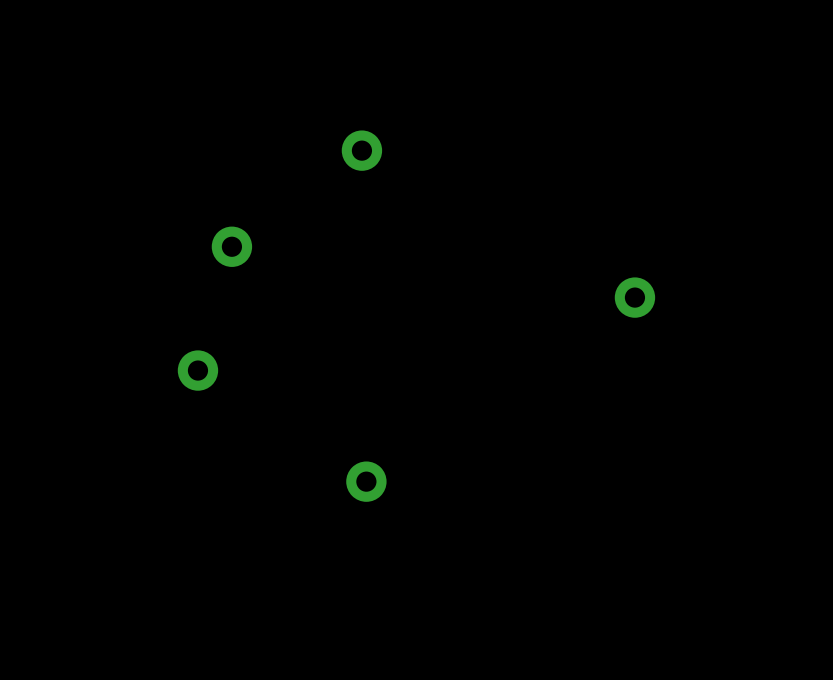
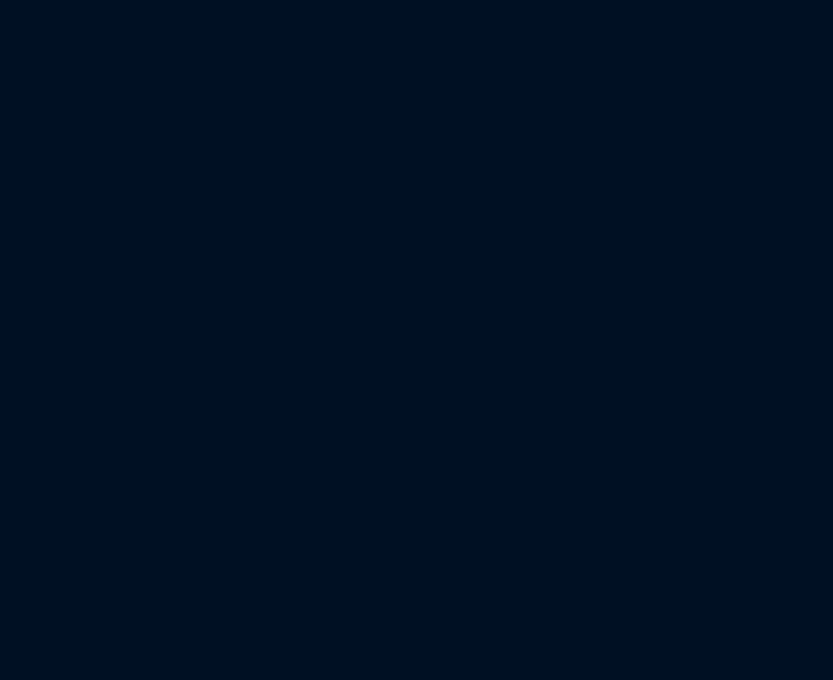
via: (361, 150) -> none
via: (231, 246) -> none
via: (634, 297) -> none
via: (197, 370) -> none
via: (366, 481) -> none

